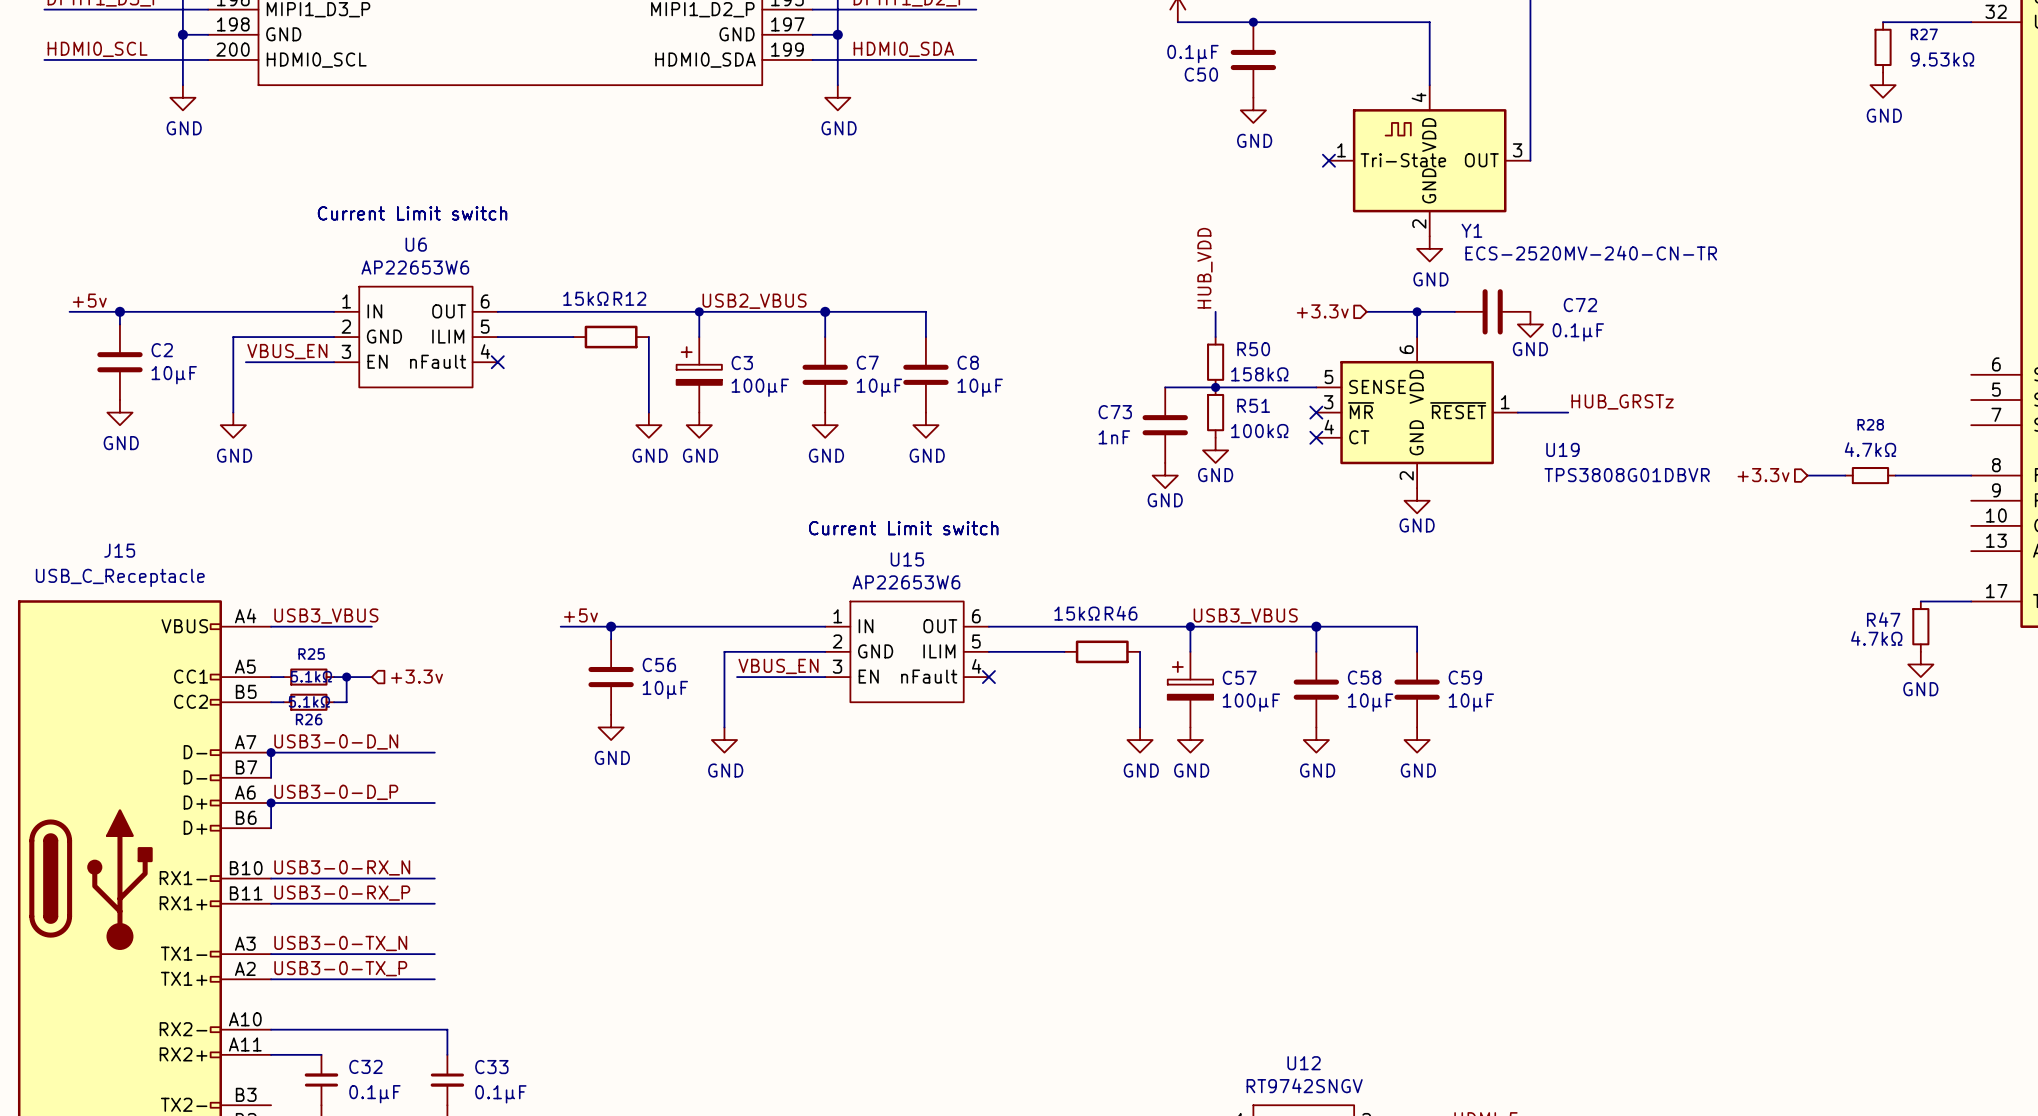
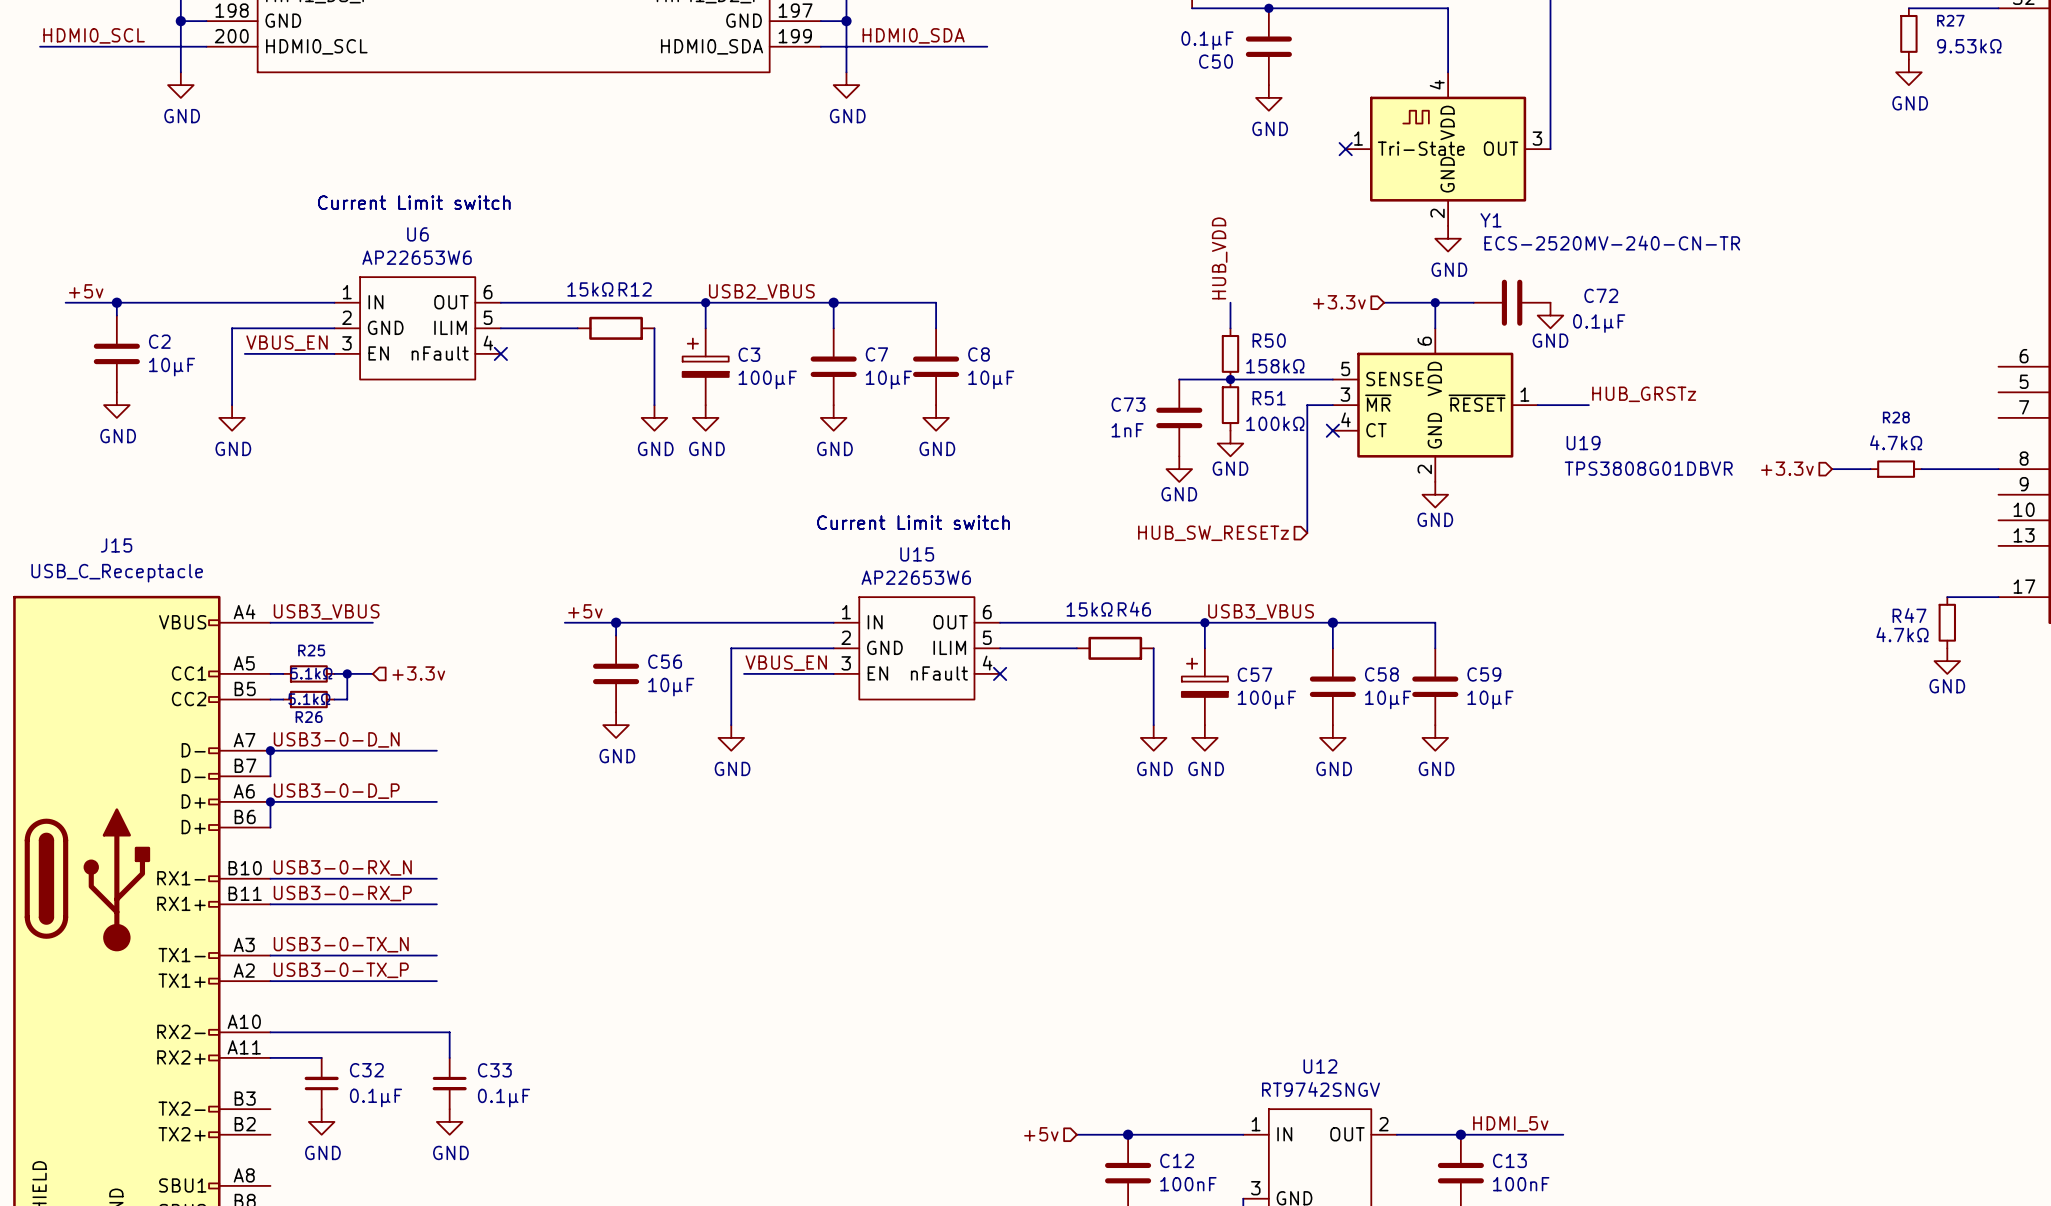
wire: none -> (1332, 405) (1307, 405) (1307, 533)
no-connect mark: (1316, 412) -> none
hierarchical label: none -> HUB_SW_RESETz (1213, 533)

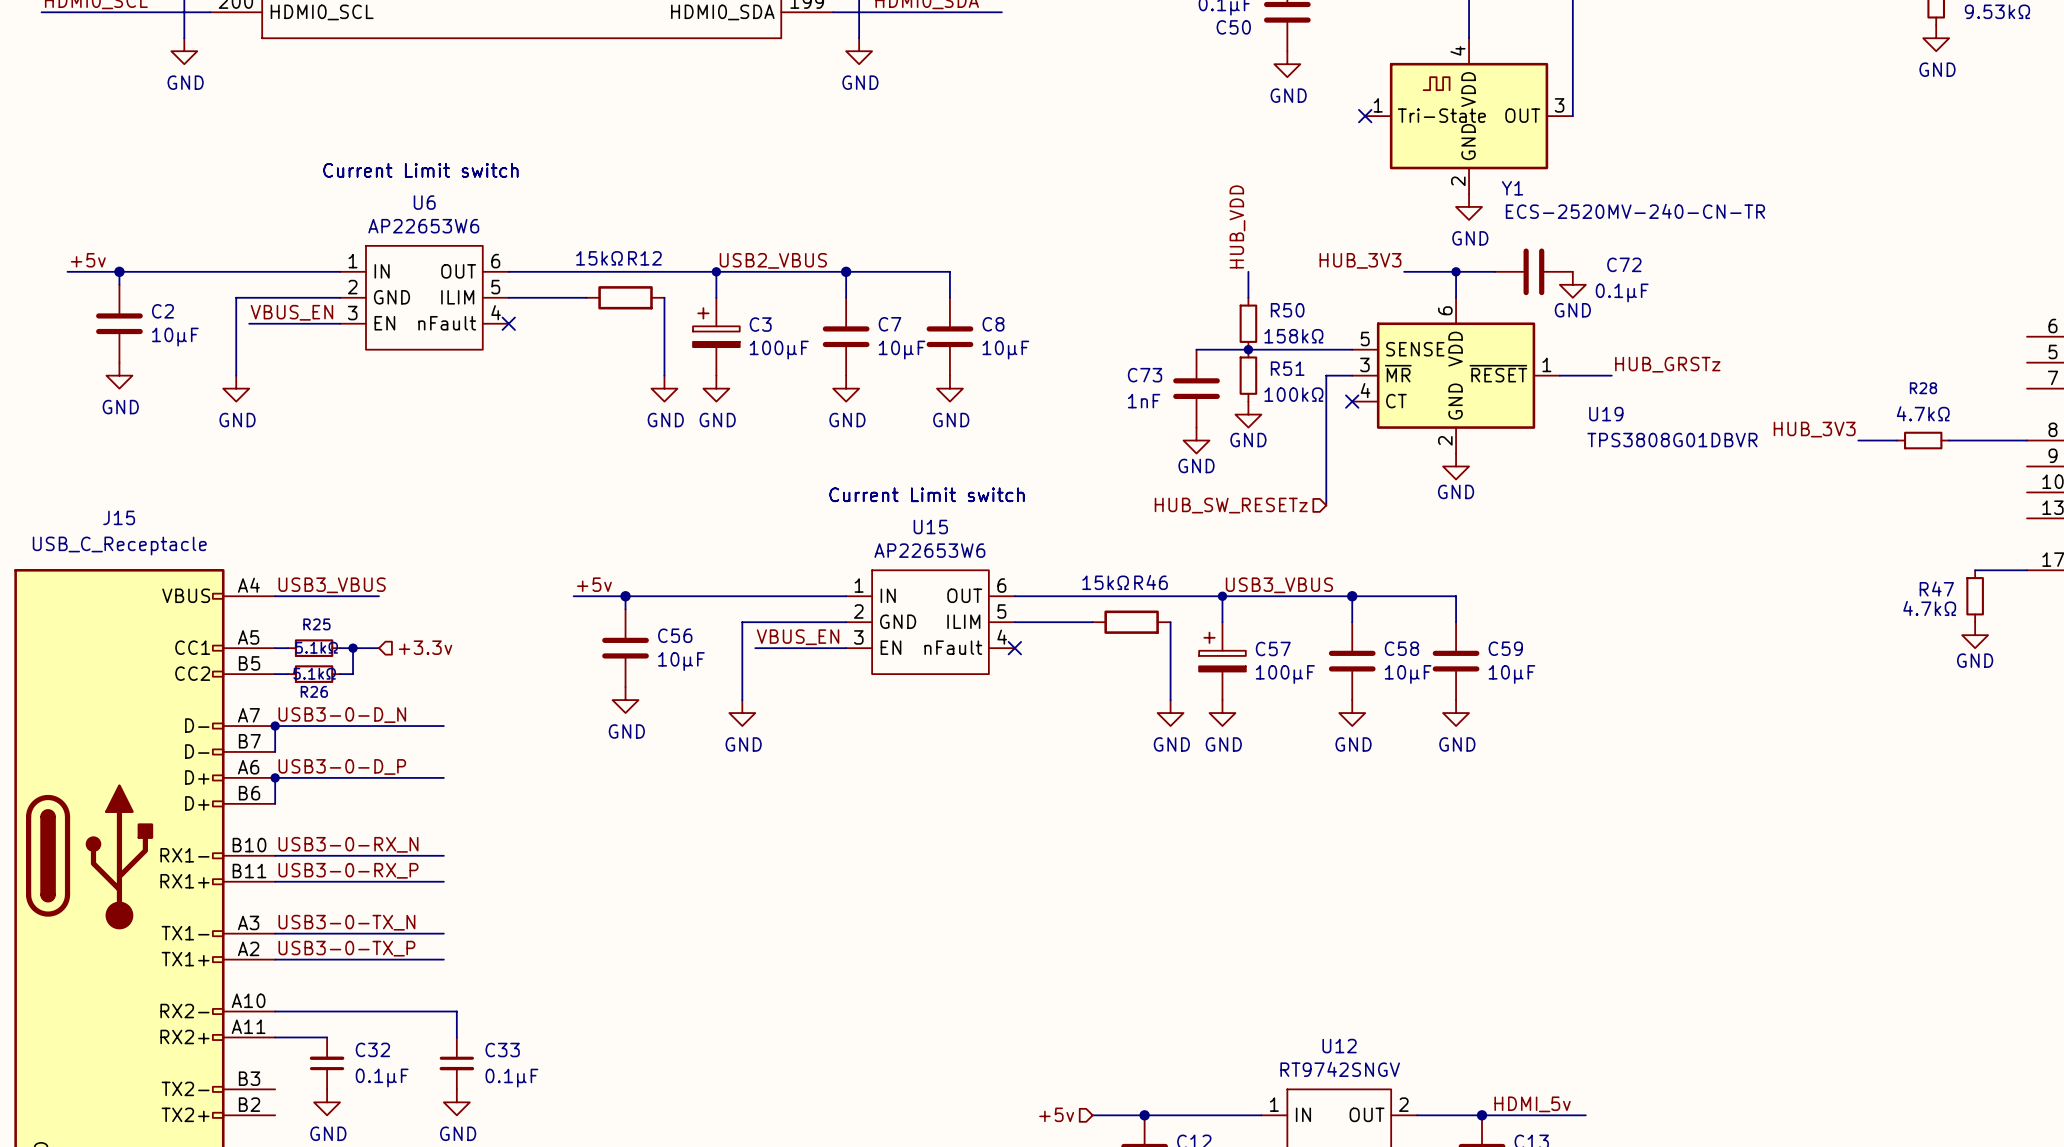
label: none -> HUB_3V3 (1360, 260)
hierarchical label: +3.3v (1339, 302) -> none
label: none -> HUB_3V3 (1814, 429)
hierarchical label: +3.3v (1787, 468) -> none

